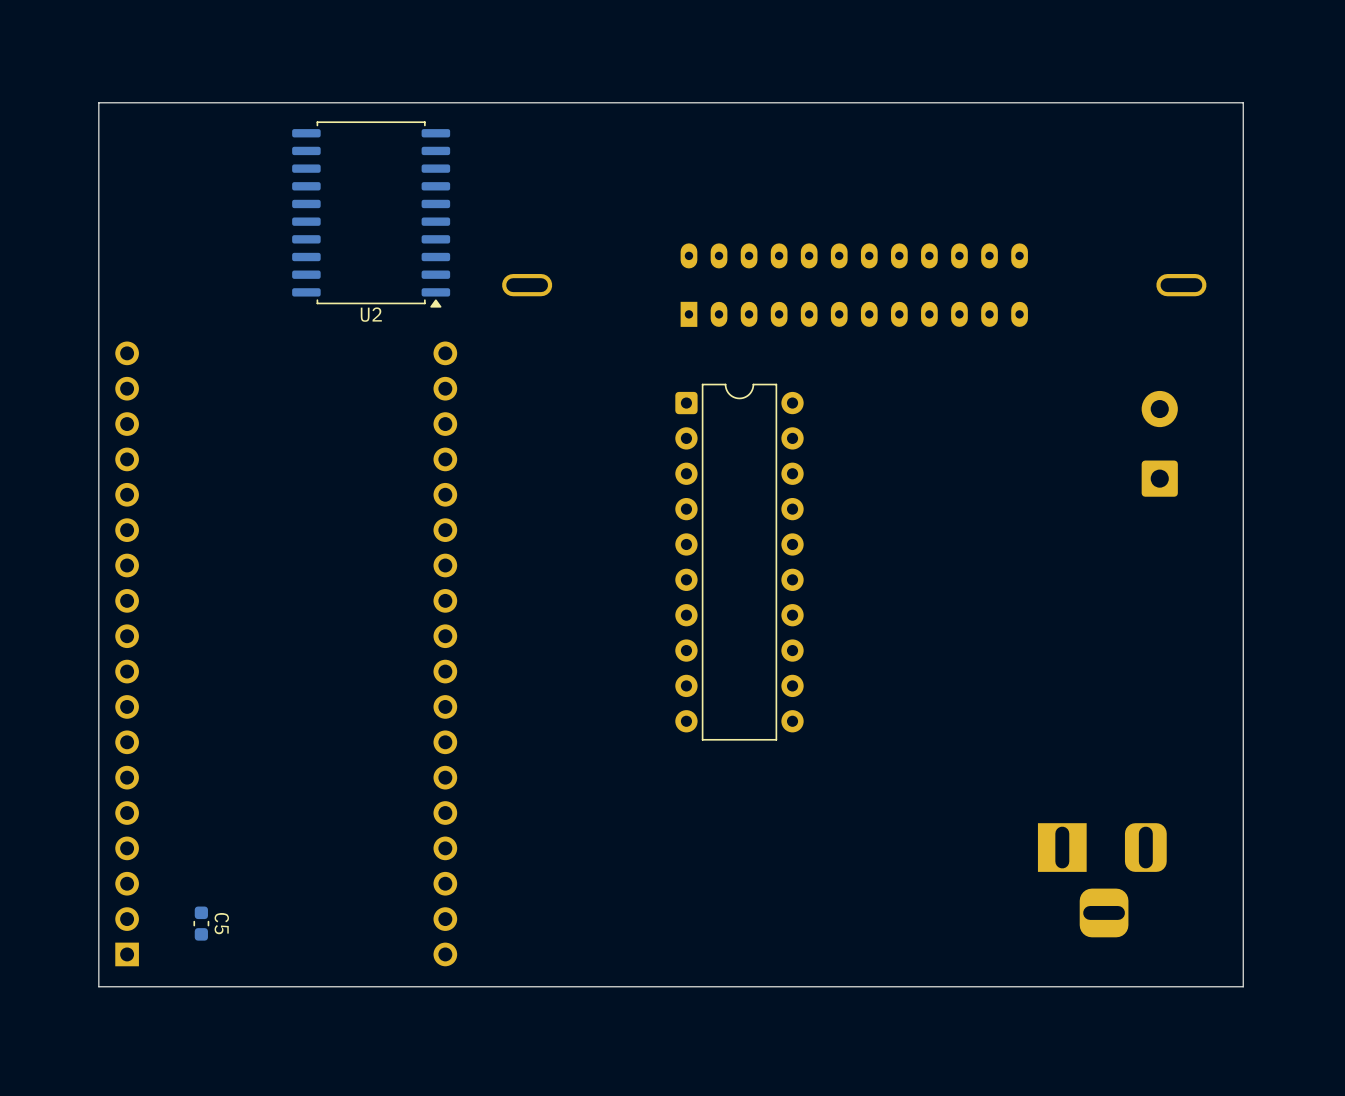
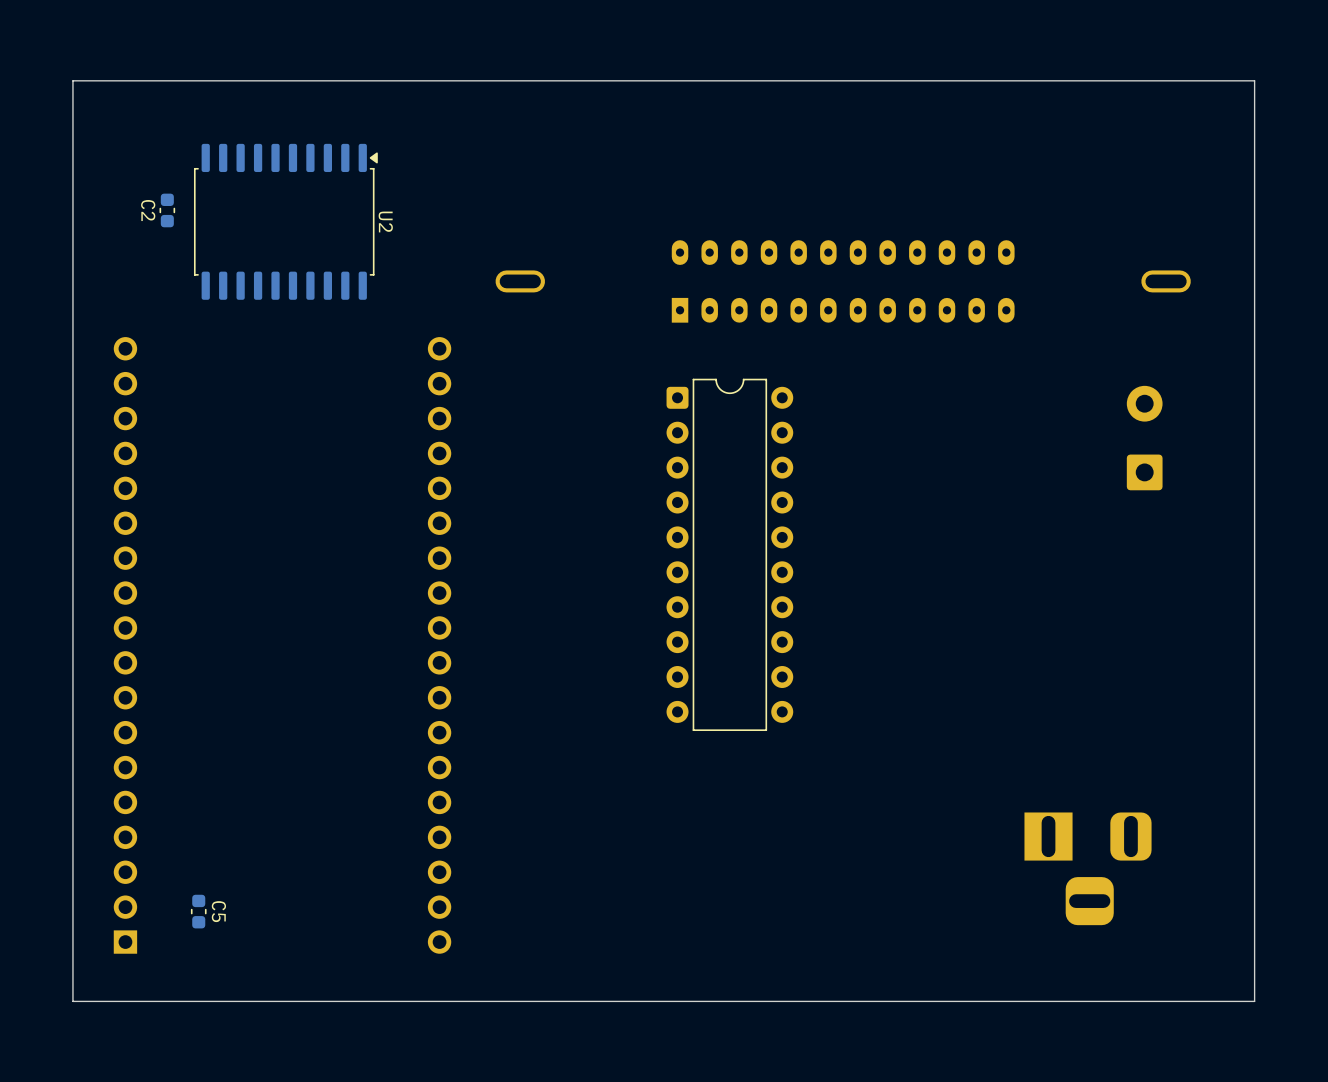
board edge: (1243, 102) (98, 102) (98, 986) (1243, 986) (1243, 102) -> (1254, 80) (1254, 1001) (72, 1001) (72, 80) (1254, 80)
C2: none -> (167, 210)
U2 rotation: 0° (371, 214) -> 90° counterclockwise (285, 221)

